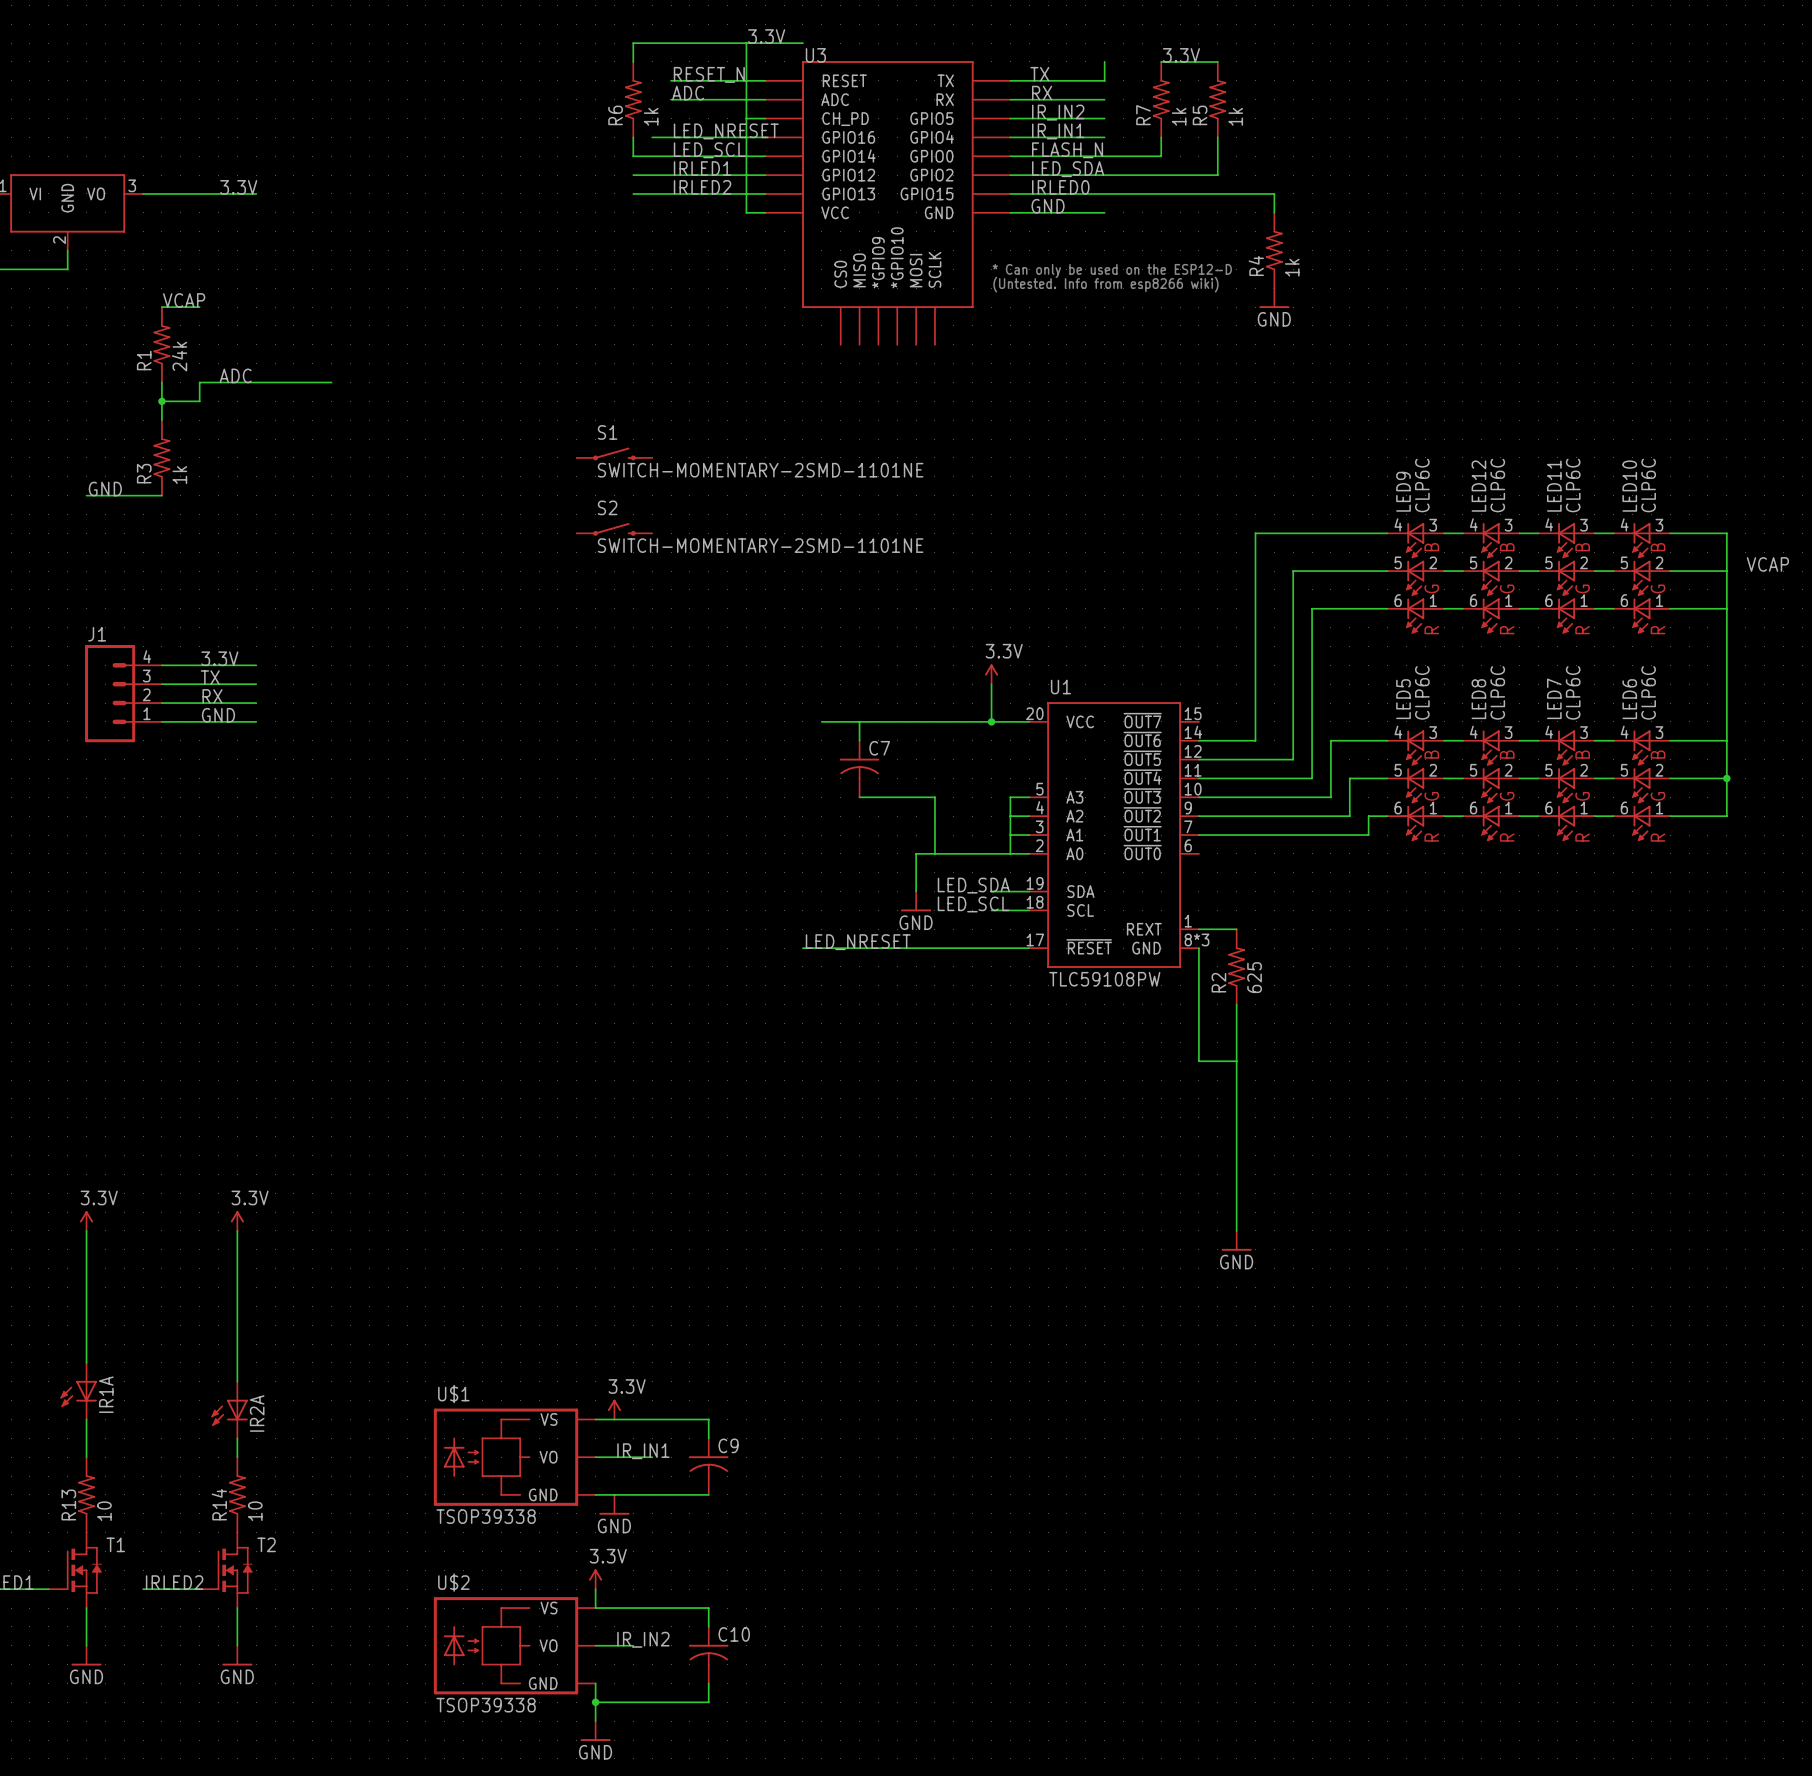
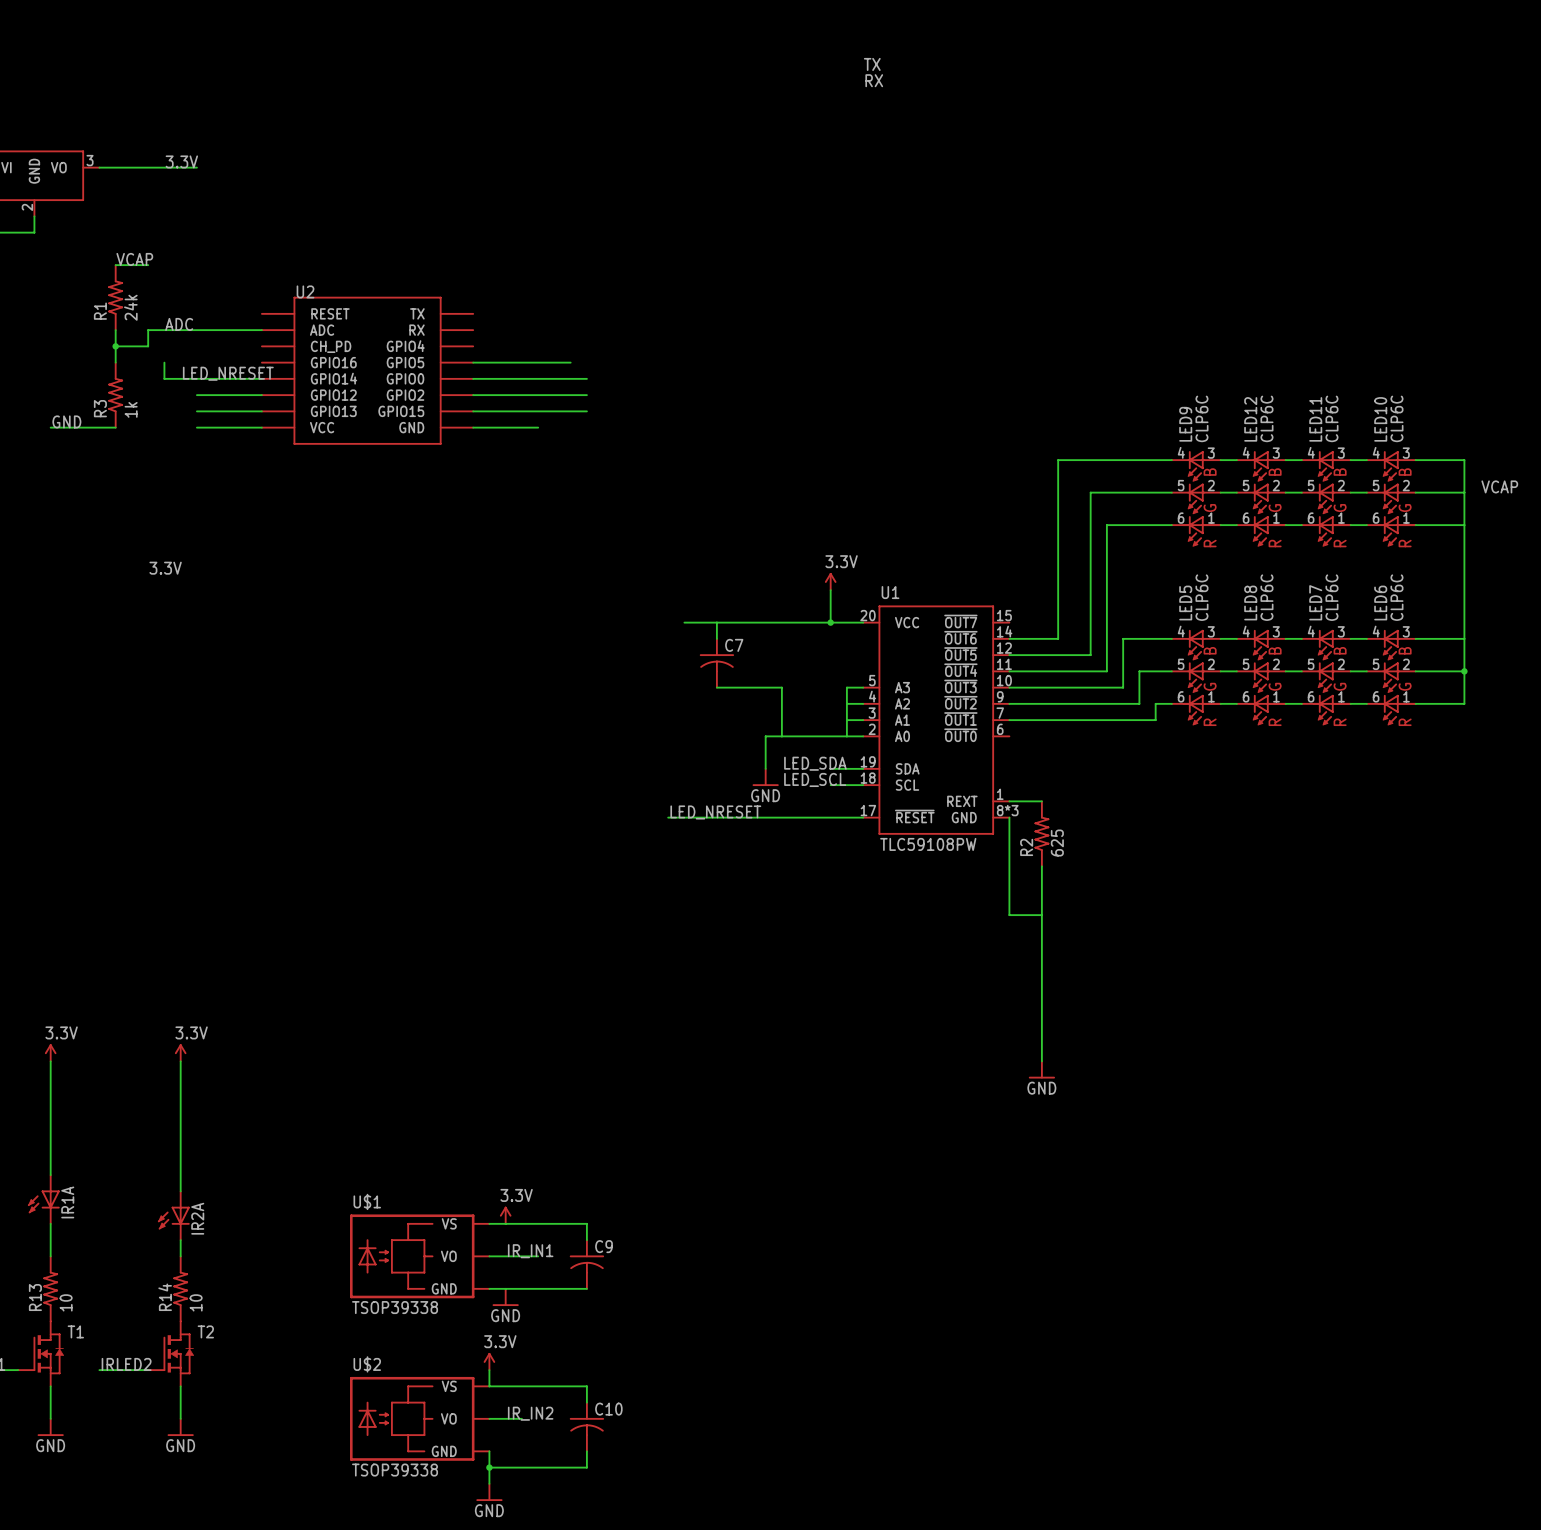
label: 3.3V (766, 36) -> none
wire: (746, 43) (746, 212) (765, 212) -> none
wire: (802, 43) (633, 43) (633, 61) -> none
label: 3.3V (1181, 55) -> none
wire: (1104, 61) (1104, 80) (1010, 80) -> none
wire: (1161, 61) (1217, 61) -> none
label: RESET_N (709, 74) -> none
wire: (671, 80) (765, 80) -> none
label: ADC (688, 93) -> none
R6: 1k (633, 99) -> none
wire: (671, 99) (765, 99) -> none
wire: (1010, 99) (1104, 99) -> none
R7: 1k (1161, 99) -> none
R5: 1k (1217, 99) -> none
label: IR_IN2 (1058, 112) -> none
wire: (746, 118) (765, 118) -> none
wire: (1010, 118) (1104, 118) -> none
label: LED_NRESET (726, 131) -> none
label: IR_IN1 (1058, 131) -> none
wire: (633, 137) (633, 156) (765, 156) -> none
wire: (652, 137) (765, 137) -> none
wire: (1010, 137) (1104, 137) -> none
wire: (1161, 137) (1161, 156) (1010, 156) -> none
wire: (1217, 137) (1217, 175) (1010, 175) -> none
label: LED_SCL (709, 150) -> none
label: FLASH_N (1067, 150) -> none
label: IRLED1 (702, 168) -> none
label: LED_SDA (1068, 169) -> none
wire: (633, 175) (765, 175) -> none
label: IRLED2 (702, 187) -> none
label: IRLED0 (1060, 187) -> none
wire: (633, 193) (765, 193) -> none
wire: (1010, 193) (1274, 193) (1274, 212) -> none
U3: (887, 202) -> none
label: GND (1048, 206) -> none
wire: (1010, 212) (1104, 212) -> none
R4: 1k (1274, 250) -> none
power symbol: GND (1274, 298) -> none
wire: none -> (164, 362) (164, 378) (261, 378)
wire: none -> (473, 362) (570, 362)
U2: none -> (367, 370)
label: none -> LED_NRESET (228, 373)
wire: none -> (473, 378) (586, 378)
S1: SWITCH-MOMENTARY-2SMD-1101NE (614, 453) -> none
wire: none -> (196, 395) (261, 395)
wire: none -> (473, 395) (586, 395)
wire: none -> (196, 411) (261, 411)
wire: none -> (473, 411) (586, 411)
wire: none -> (196, 427) (261, 427)
wire: none -> (473, 427) (538, 427)
S2: SWITCH-MOMENTARY-2SMD-1101NE (614, 529) -> none
wire: (161, 665) (256, 665) -> none
label: TX (210, 677) -> none
wire: (161, 684) (256, 684) -> none
J1: (123, 693) -> none
label: RX (212, 696) -> none
wire: (161, 703) (256, 703) -> none
label: GND (218, 715) -> none
wire: (161, 721) (256, 721) -> none

